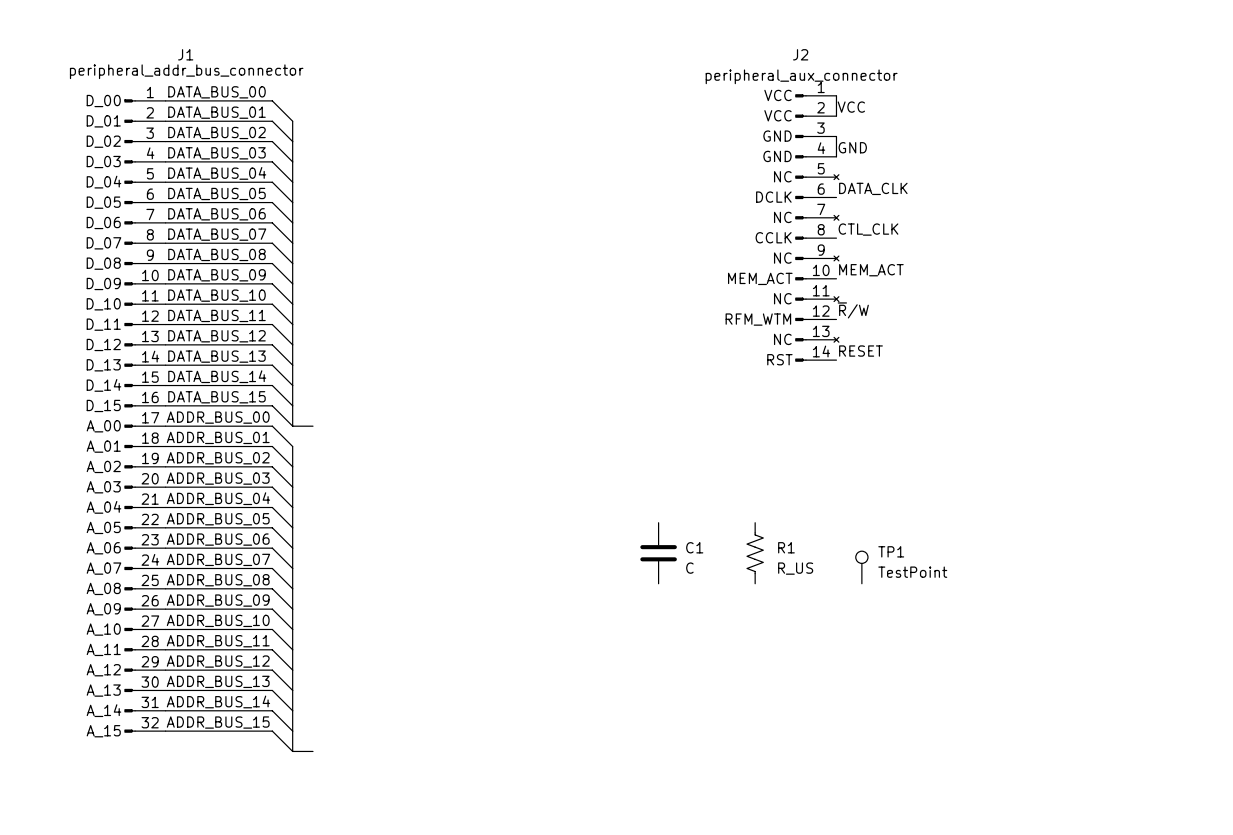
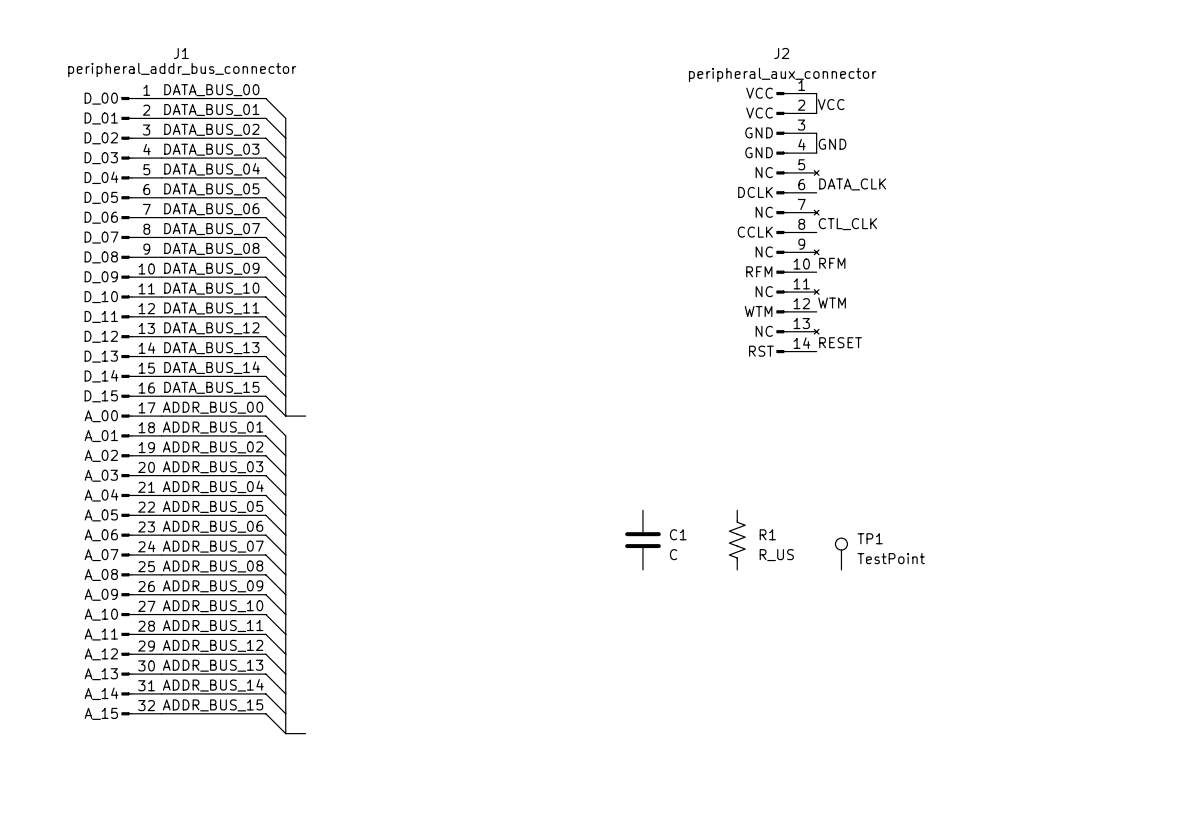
label: MEM_ACT (871, 270) -> RFM (832, 263)
J2 pin name: MEM_ACT (760, 278) -> RFM (759, 271)
label: ~{R}/W (853, 310) -> WTM (832, 303)
J2 pin name: RFM_WTM (758, 319) -> WTM (758, 311)

